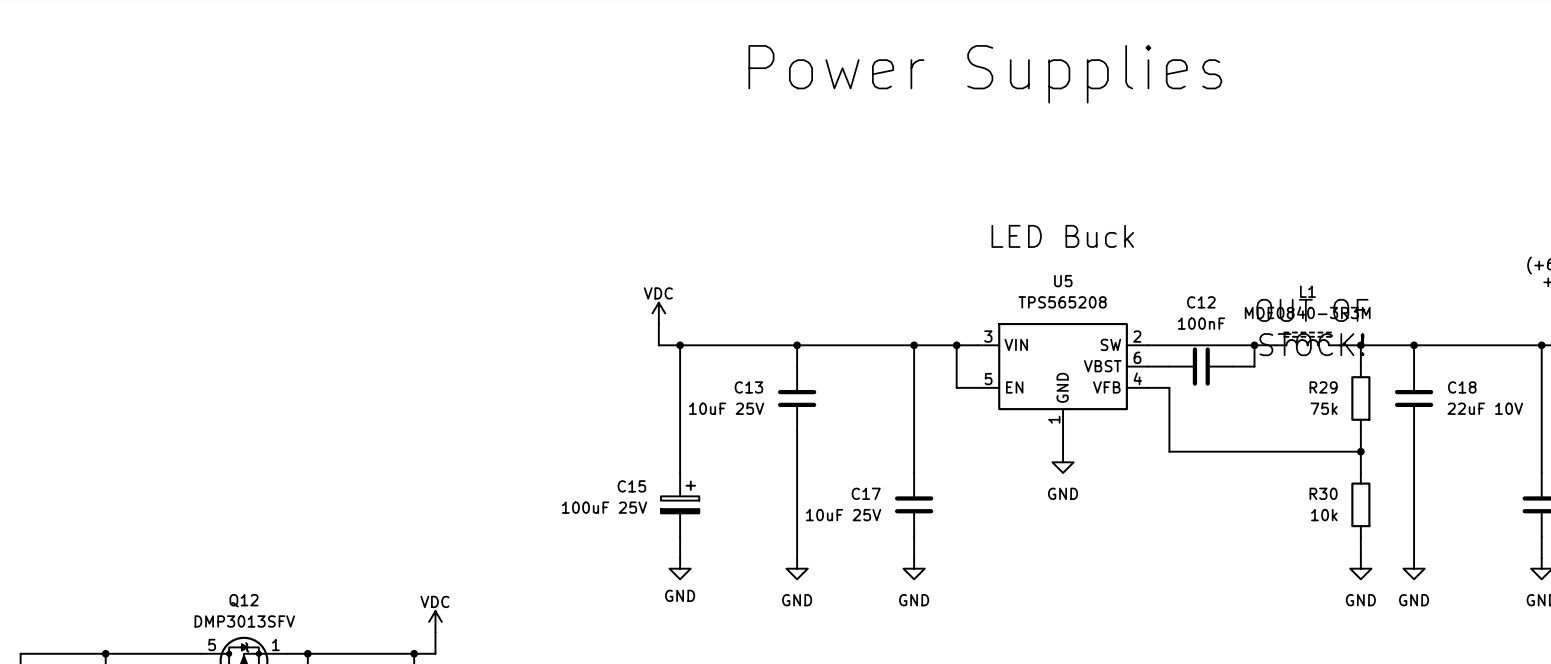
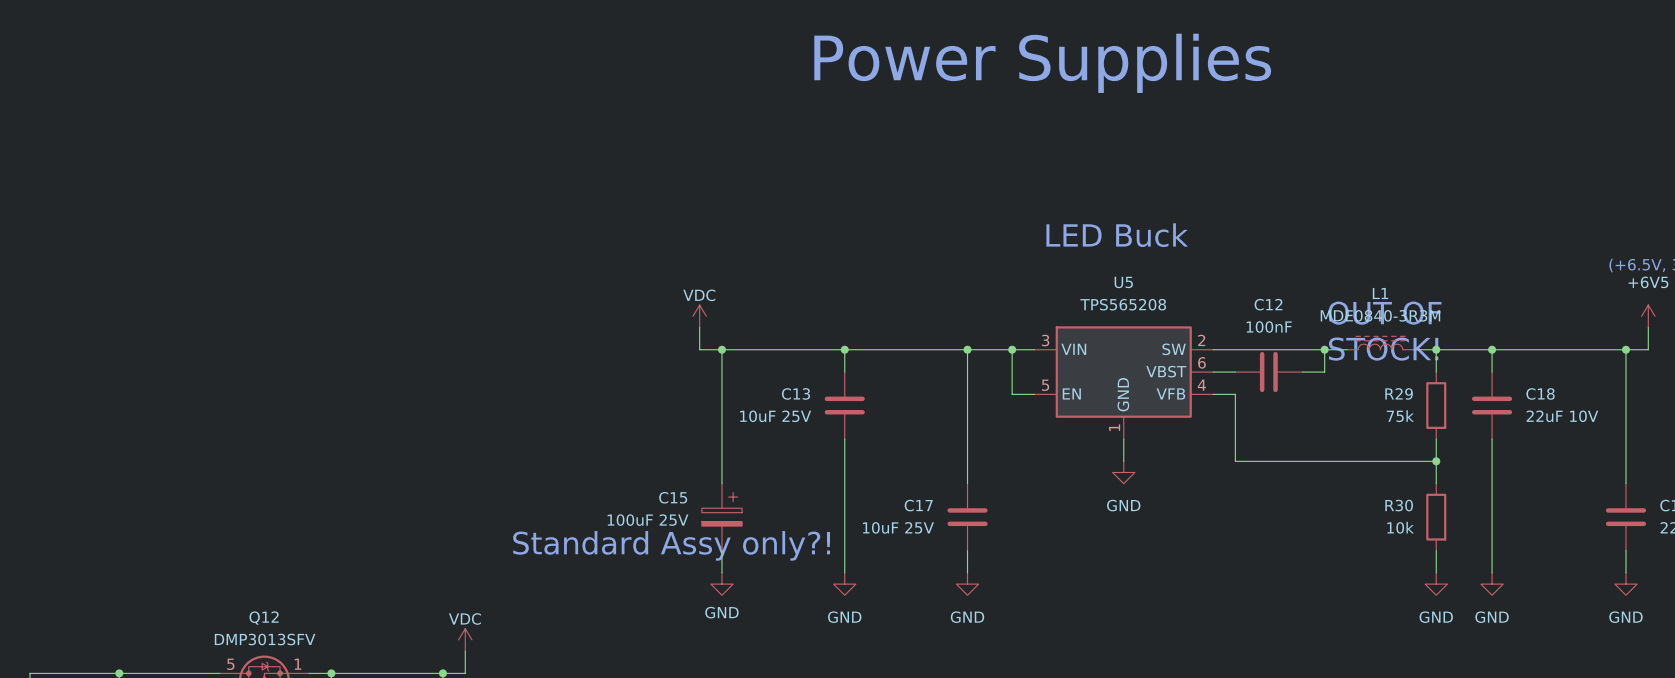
text: none -> Standard Assy only?! (671, 545)

